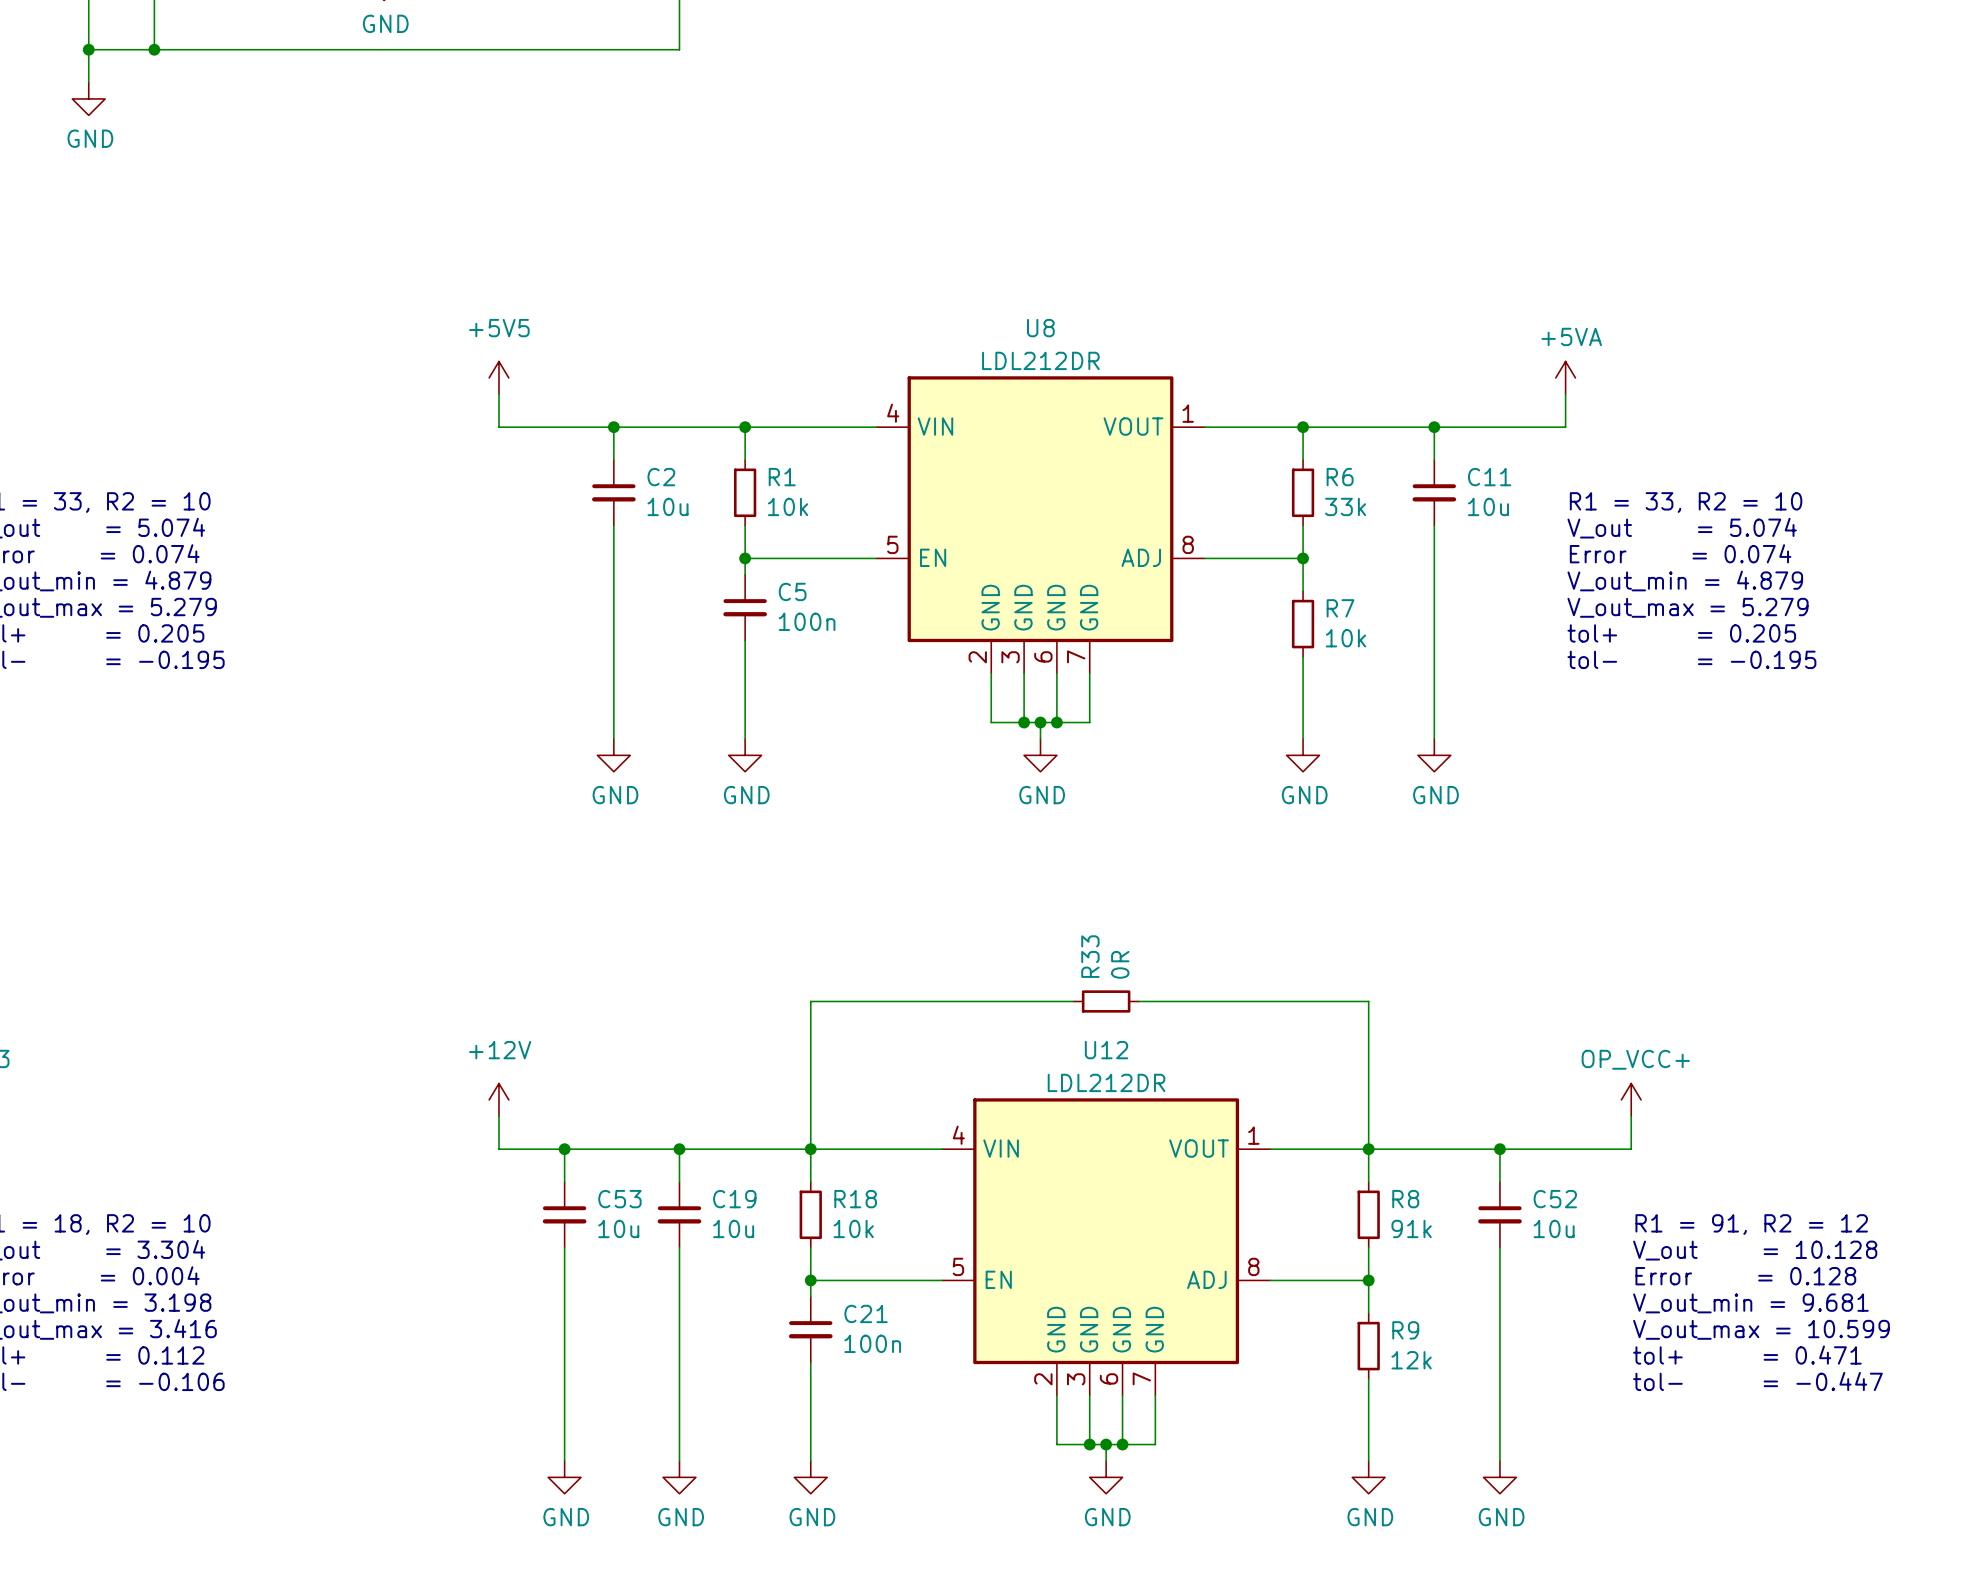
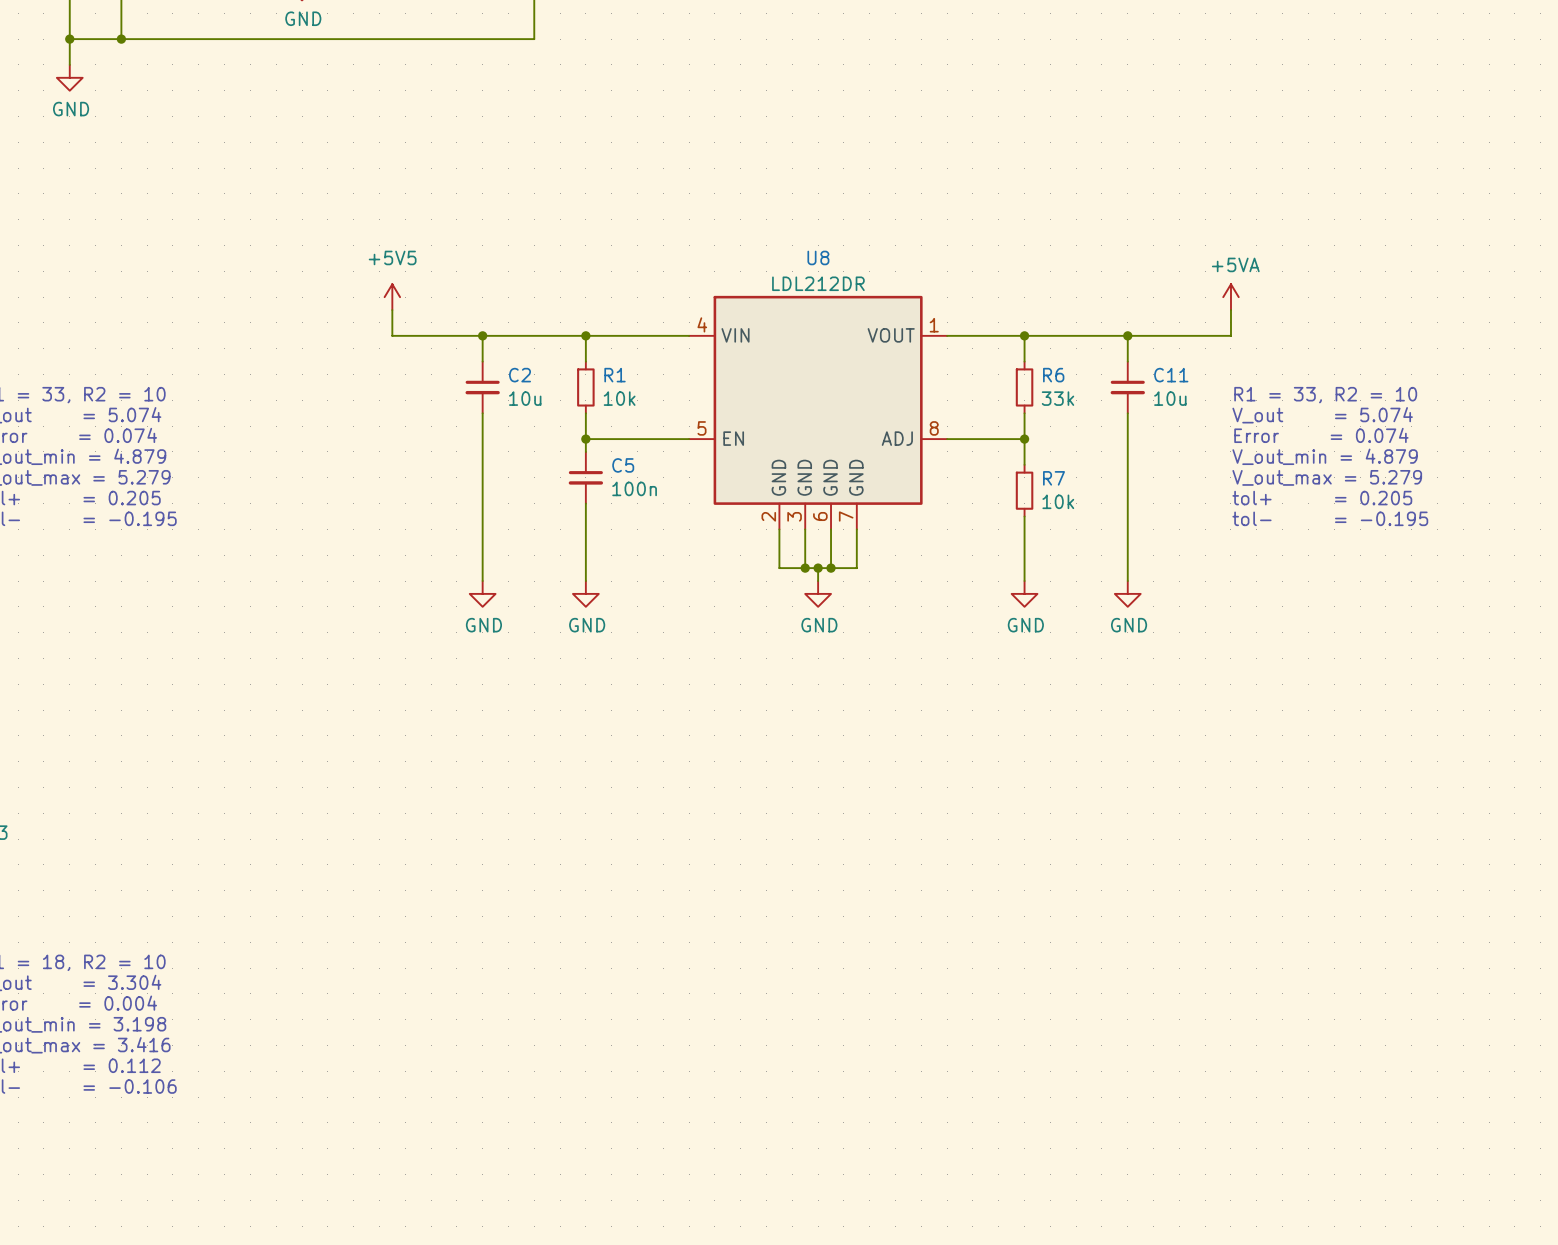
wire: (1073, 1001) (810, 1001) (810, 1181) -> none
R33: 0R (1106, 1001) -> none
wire: (1138, 1001) (1368, 1001) (1368, 1181) -> none
power symbol: +12V (498, 1099) -> none
power symbol: OP_VCC+ (1631, 1099) -> none
wire: (498, 1116) (498, 1149) (942, 1149) -> none
wire: (1631, 1116) (1631, 1149) (1270, 1149) -> none
wire: (564, 1149) (564, 1181) -> none
junction: (564, 1149) -> none
wire: (679, 1149) (679, 1181) -> none
junction: (679, 1149) -> none
junction: (810, 1149) -> none
junction: (1368, 1149) -> none
wire: (1499, 1149) (1499, 1181) -> none
junction: (1499, 1149) -> none
C53: 10u (564, 1214) -> none
C19: 10u (679, 1214) -> none
R18: 10k (810, 1214) -> none
R8: 91k (1368, 1214) -> none
C52: 10u (1499, 1214) -> none
text: R1 = 91, R2 = 12 (1751, 1224) -> none
U12: LDL212DR (1106, 1246) -> none
wire: (564, 1247) (564, 1460) -> none
wire: (679, 1247) (679, 1460) -> none
wire: (810, 1247) (810, 1296) -> none
wire: (1368, 1247) (1368, 1313) -> none
wire: (1499, 1247) (1499, 1460) -> none
text: V_out = 10.128 (1755, 1250) -> none
text: Error = 0.128 (1745, 1276) -> none
wire: (810, 1280) (942, 1280) -> none
junction: (810, 1280) -> none
wire: (1270, 1280) (1368, 1280) -> none
junction: (1368, 1280) -> none
text: V_out_min = 9.681 (1750, 1303) -> none
C21: 100n (810, 1329) -> none
text: V_out_max = 10.599 (1761, 1329) -> none
R9: 12k (1368, 1346) -> none
text: tol+ = 0.471 (1747, 1355) -> none
wire: (810, 1362) (810, 1460) -> none
wire: (1368, 1378) (1368, 1460) -> none
text: tol- = -0.447 (1757, 1381) -> none
wire: (1056, 1395) (1056, 1444) (1155, 1444) (1155, 1395) -> none
wire: (1089, 1395) (1089, 1444) -> none
wire: (1122, 1395) (1122, 1444) -> none
junction: (1089, 1444) -> none
wire: (1106, 1444) (1106, 1460) -> none
junction: (1106, 1444) -> none
junction: (1122, 1444) -> none
power symbol: GND (564, 1477) -> none
power symbol: GND (679, 1477) -> none
power symbol: GND (810, 1477) -> none
power symbol: GND (1106, 1477) -> none
power symbol: GND (1368, 1477) -> none
power symbol: GND (1499, 1477) -> none

